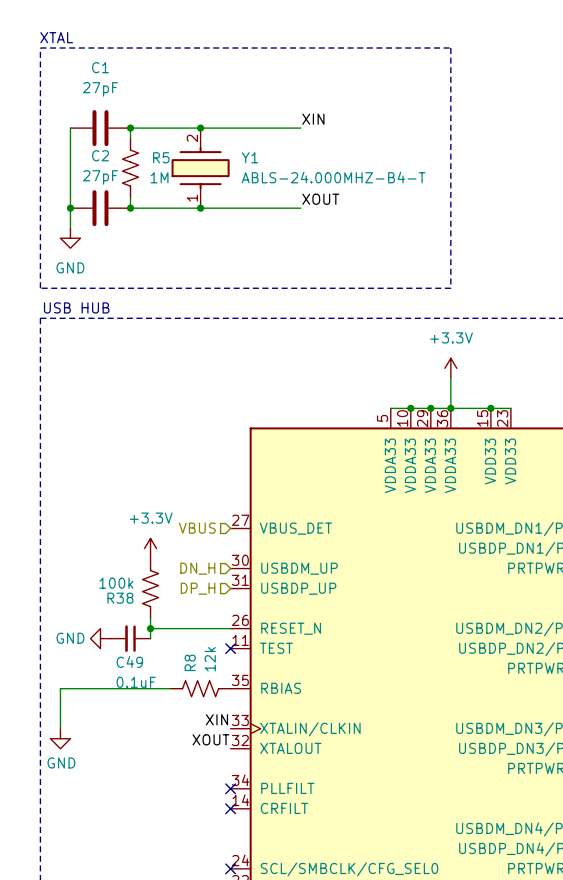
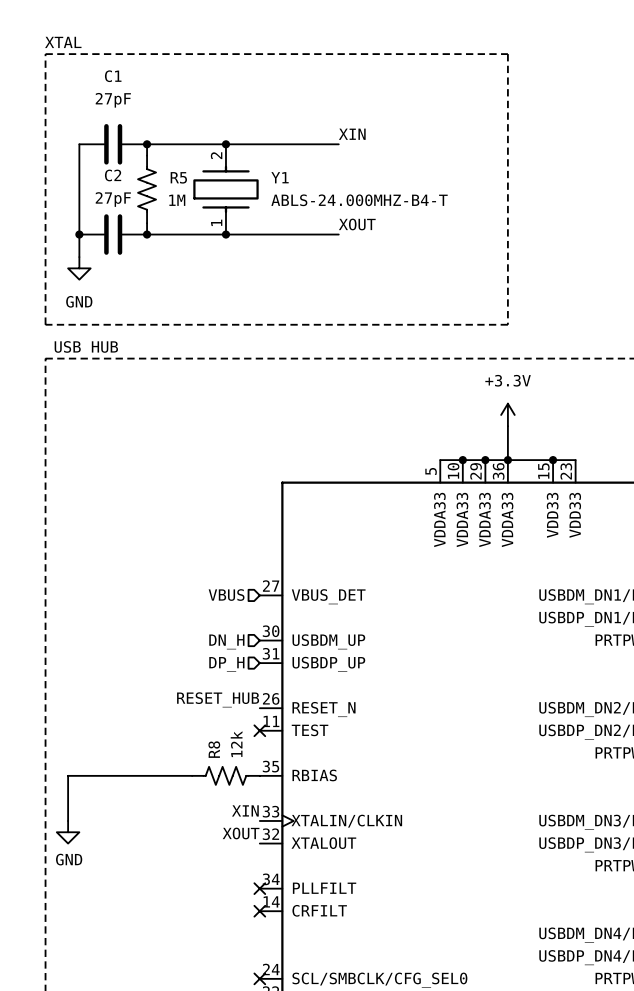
power symbol: +3.3V (150, 548) -> none
R38: 100k (150, 588) -> none
wire: (150, 618) (150, 638) -> none
label: none -> RESET_HUB (218, 699)
wire: (150, 628) (230, 628) -> none
junction: (150, 628) -> none
power symbol: GND (100, 638) -> none
C49: 0.1uF (130, 638) -> none

